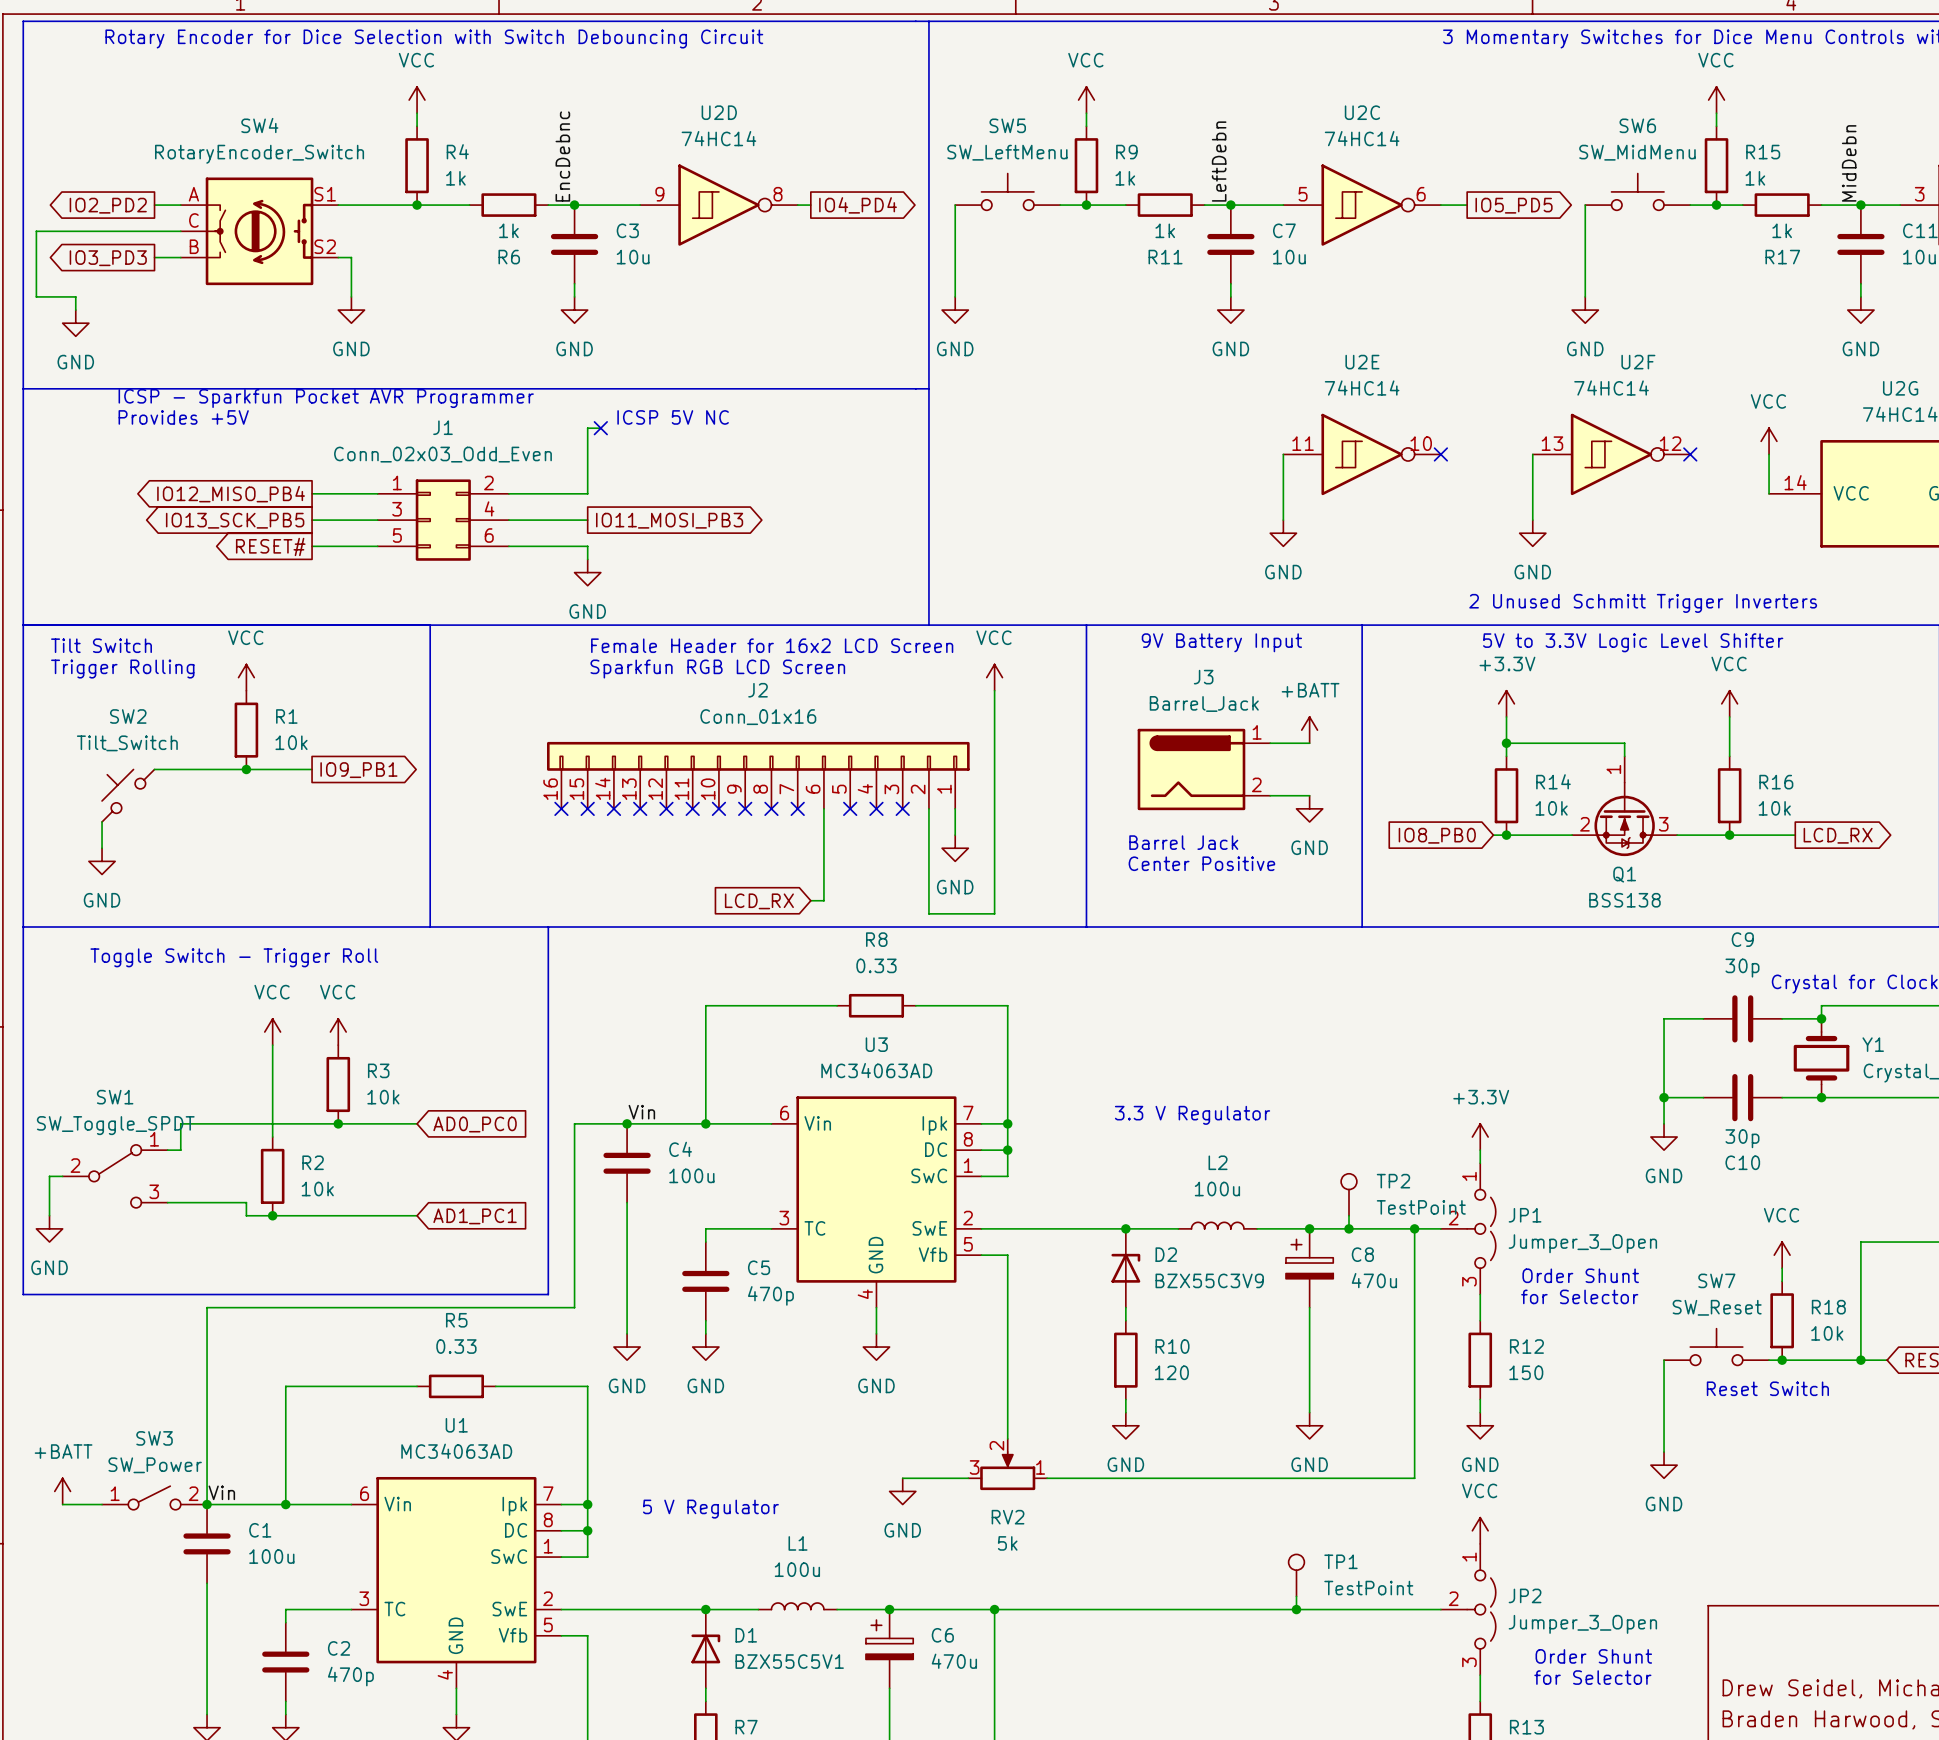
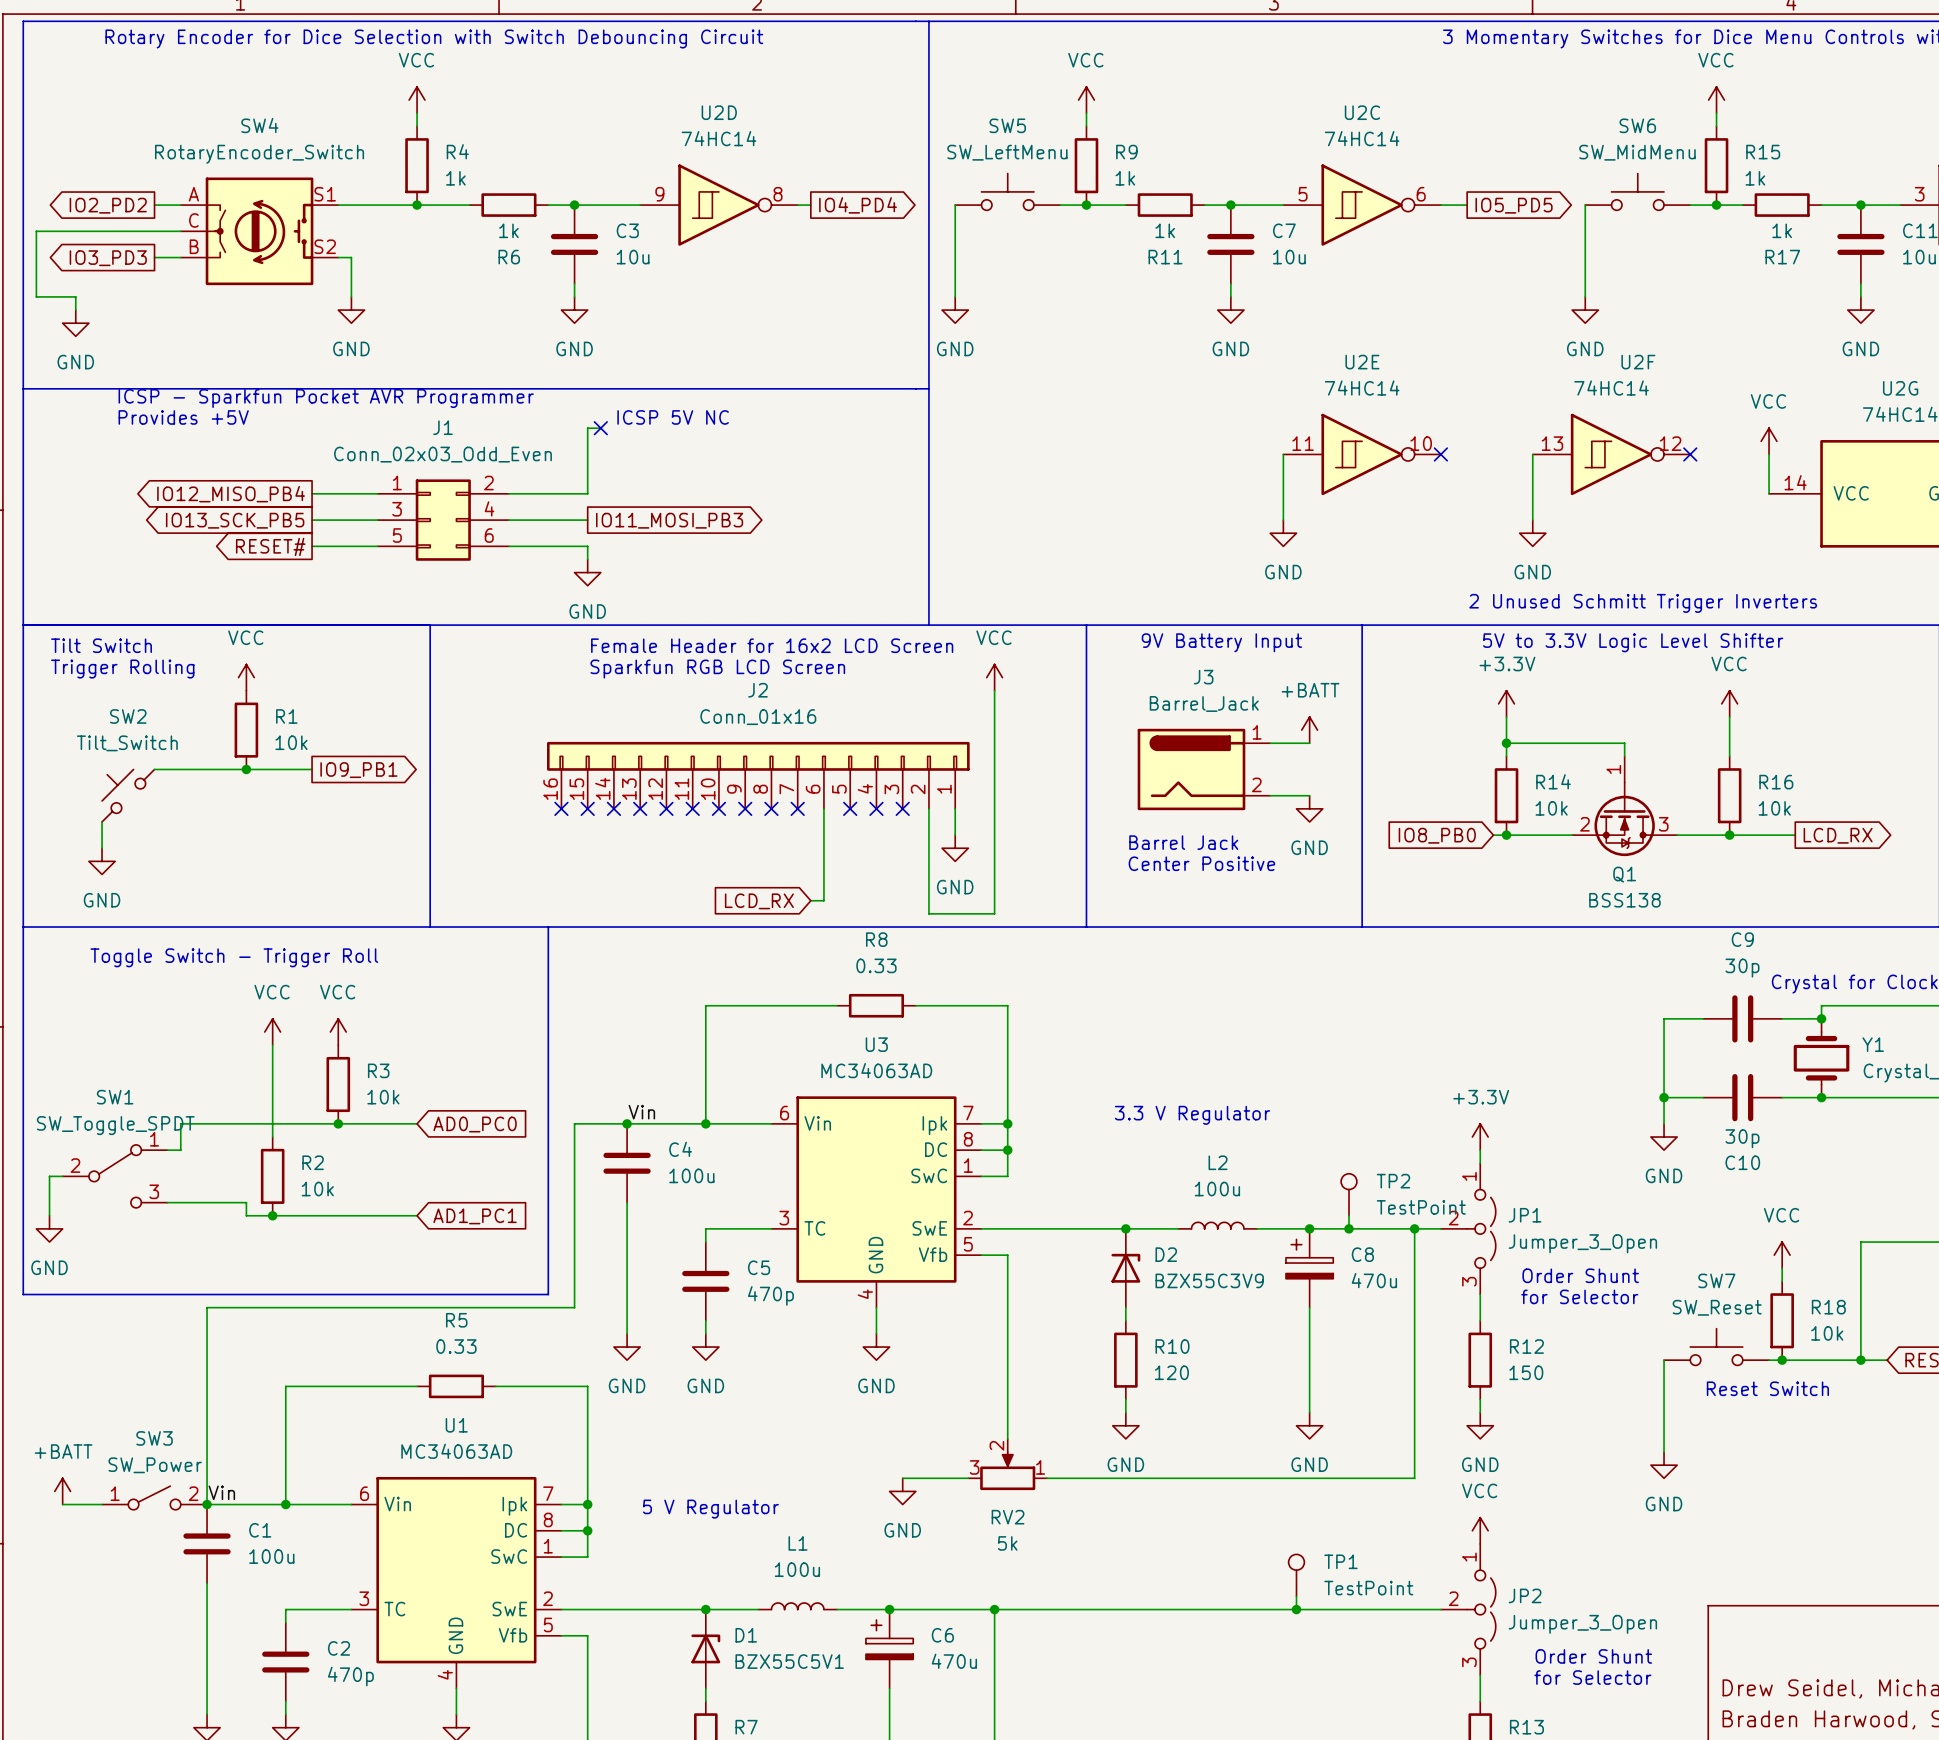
label: EncDebnc (562, 156) -> none
label: LeftDebn (1219, 161) -> none
label: MidDebn (1849, 163) -> none

